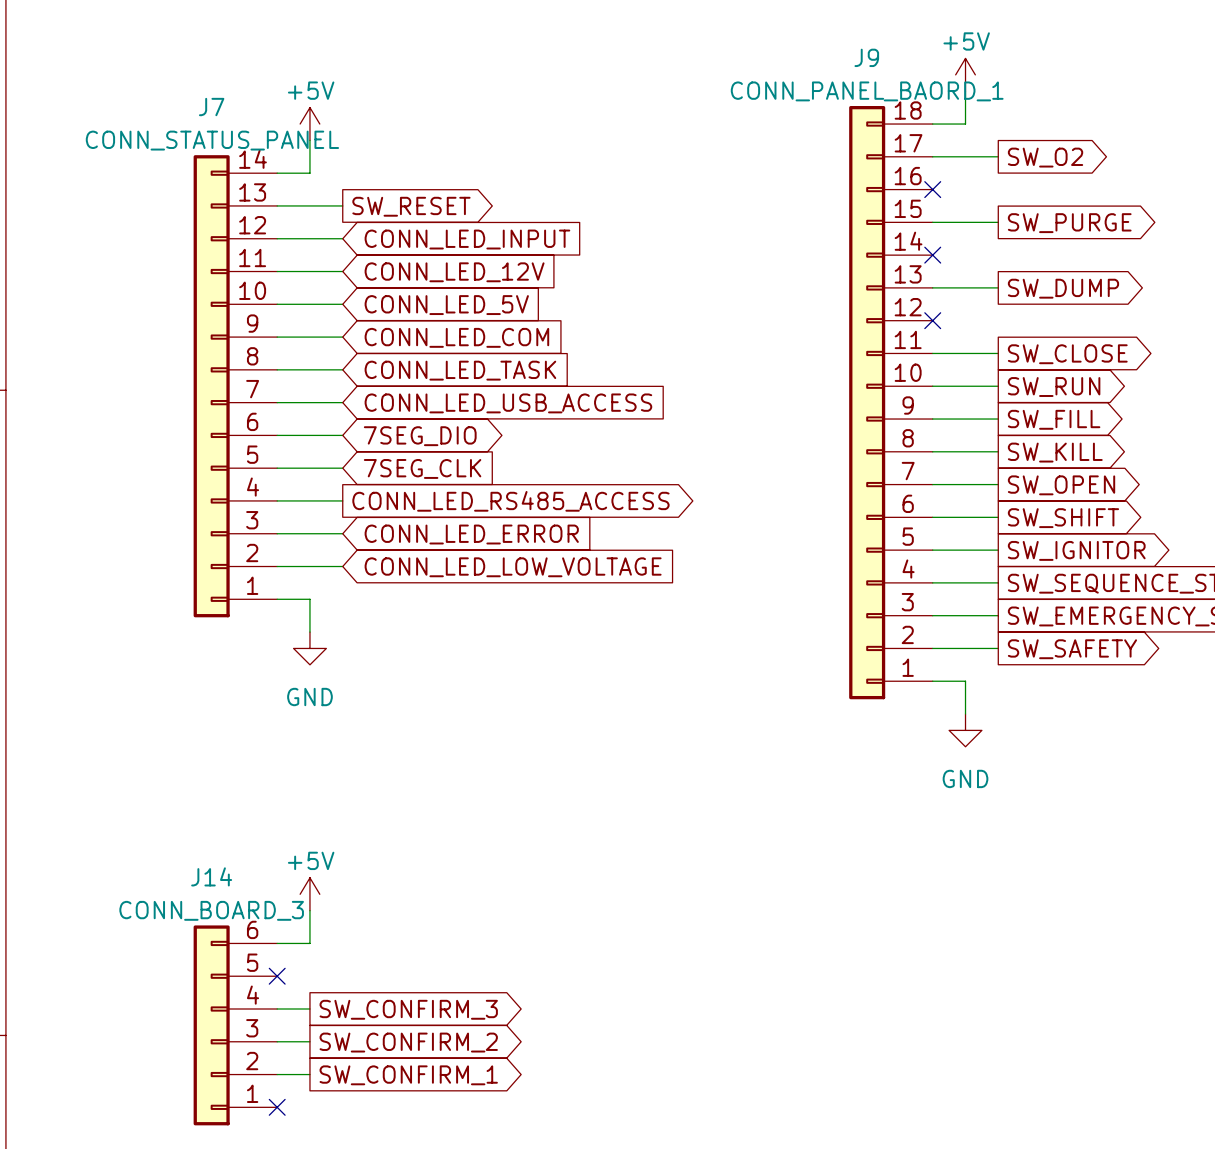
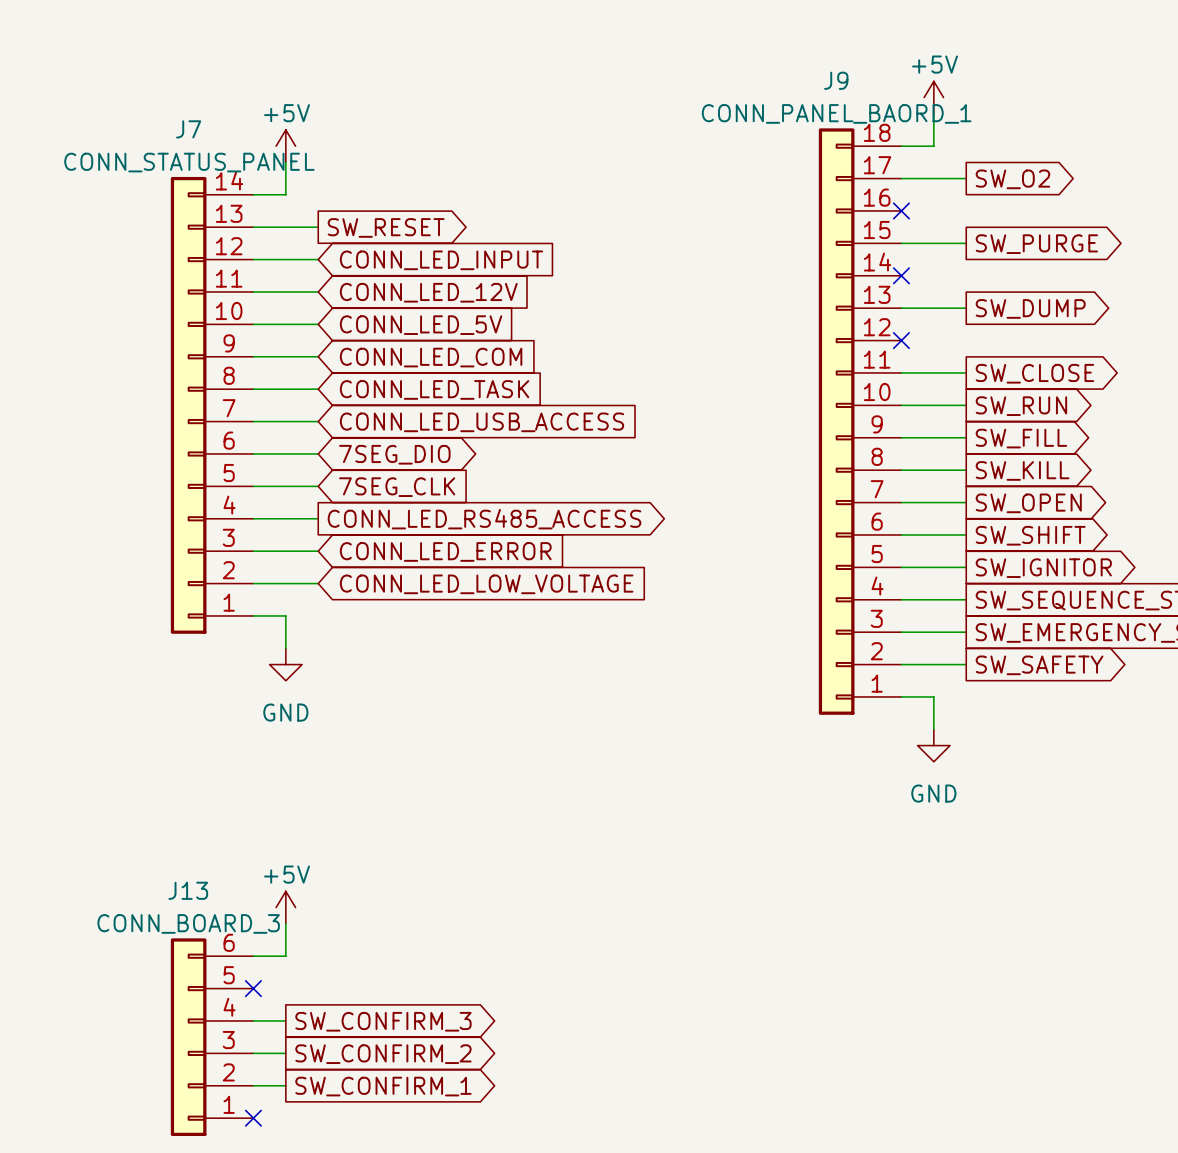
J14 name: J14 (211, 876) -> J13 (188, 890)

